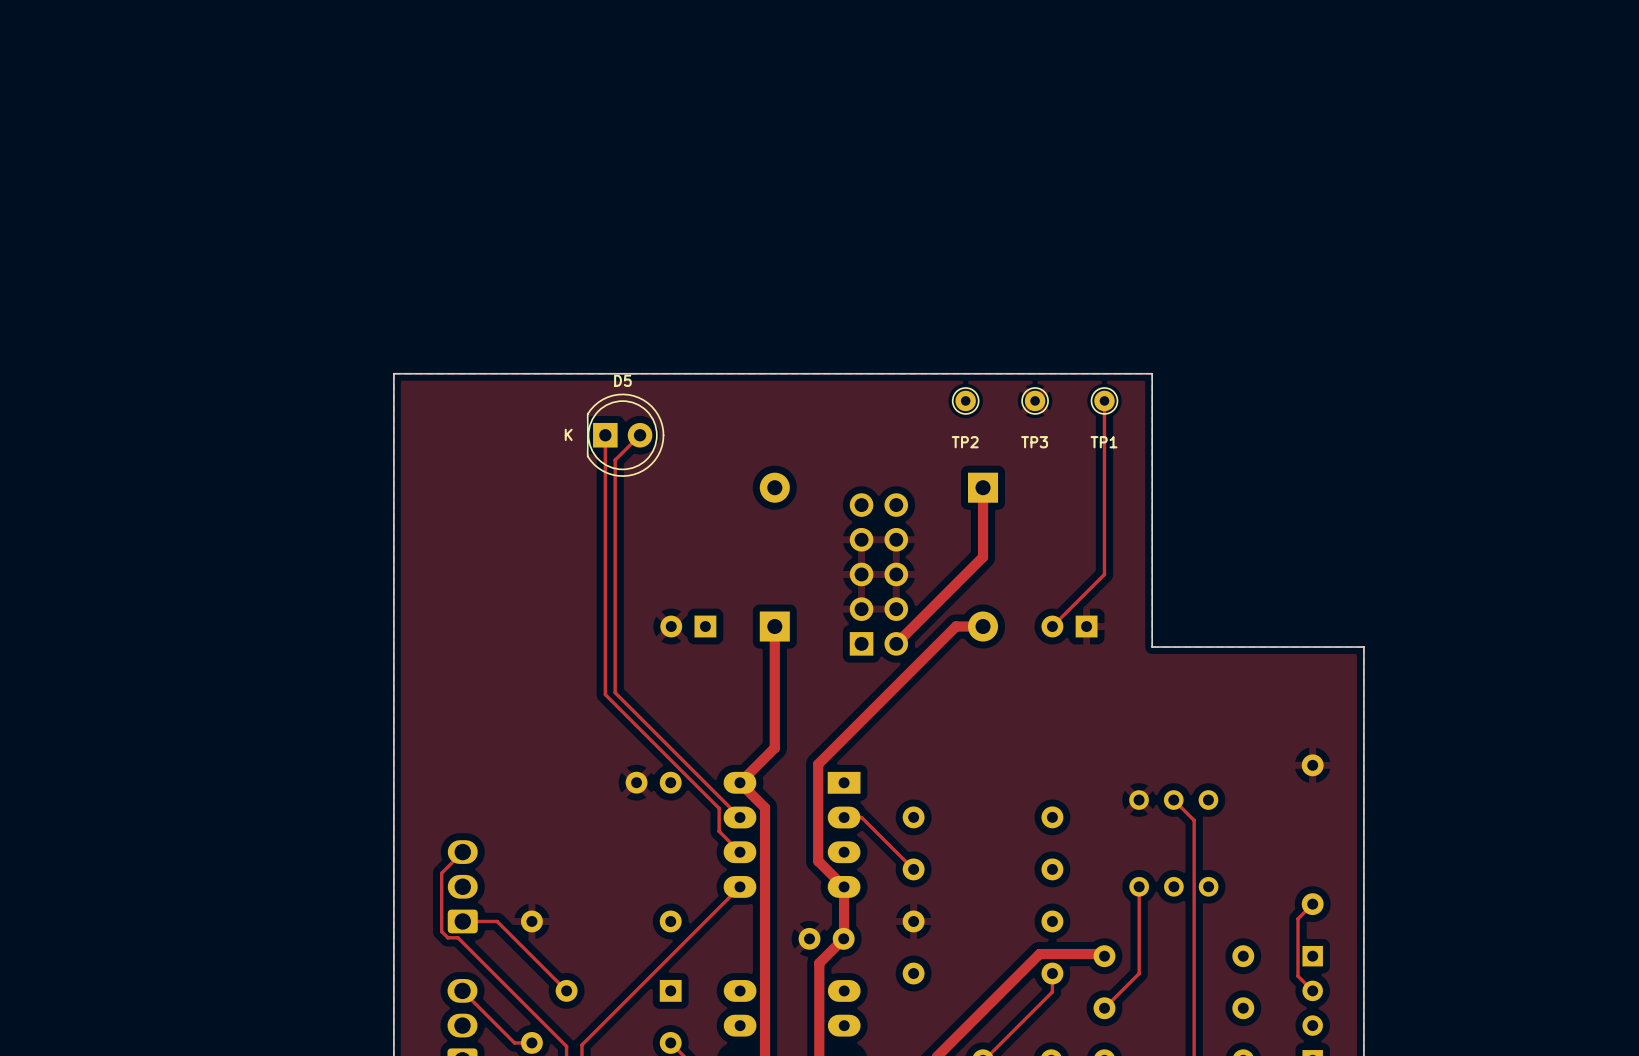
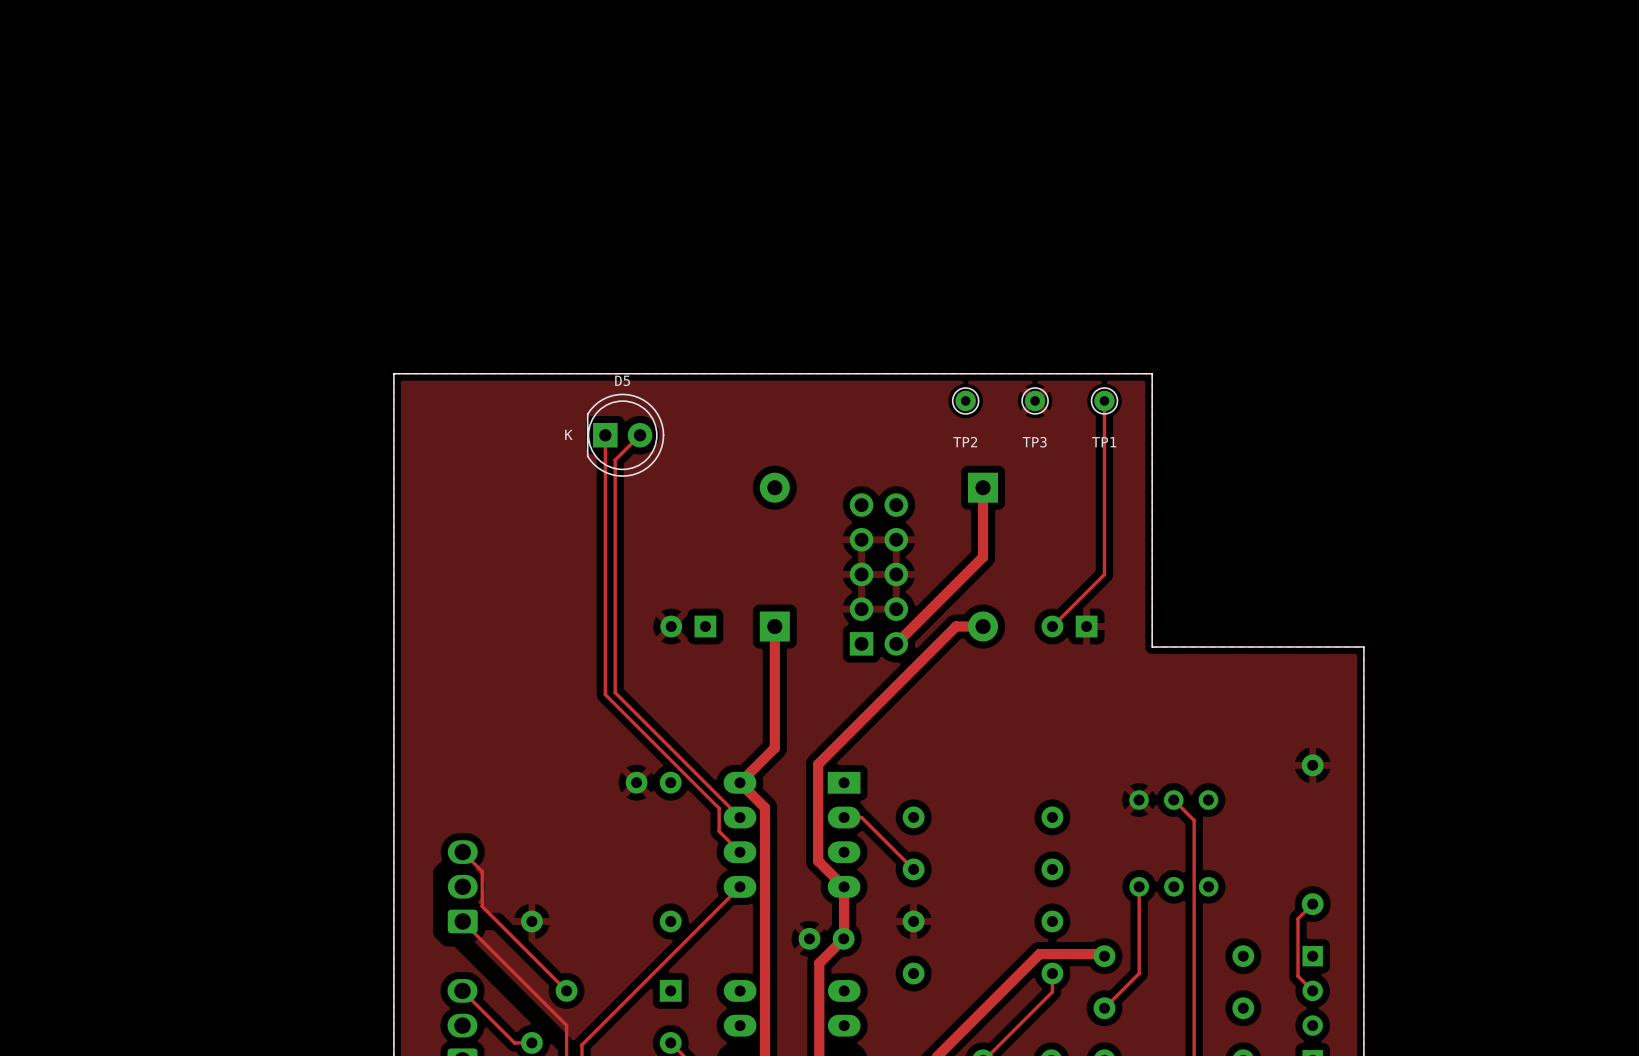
track: (462, 852) (441, 873) (441, 931) (447, 937) (458, 937) (566, 1046) -> (462, 921) (566, 1025) (566, 1046)
track: (462, 921) (497, 921) -> (462, 852) (482, 871) (482, 906) (497, 921)

